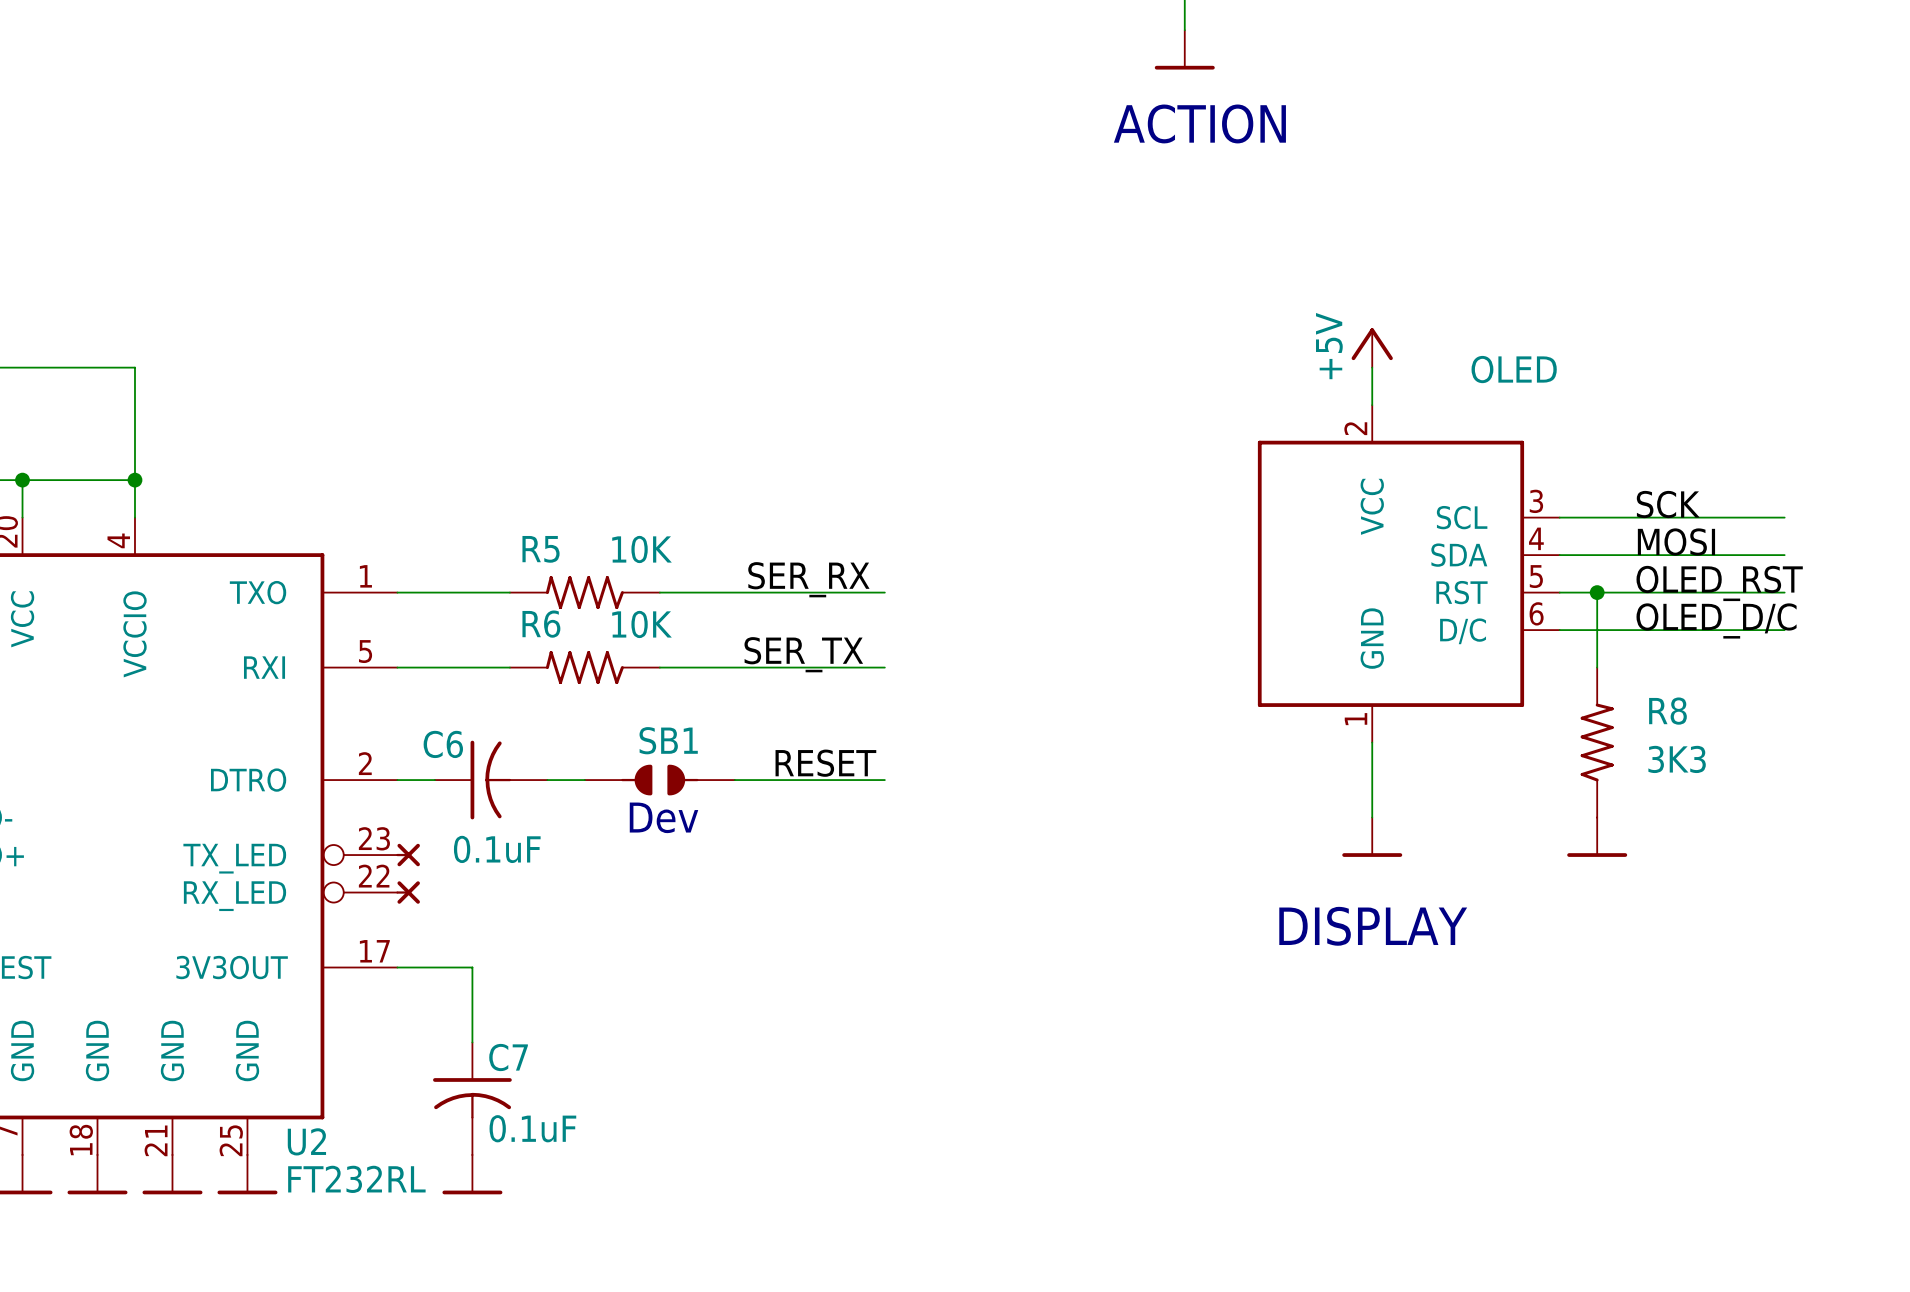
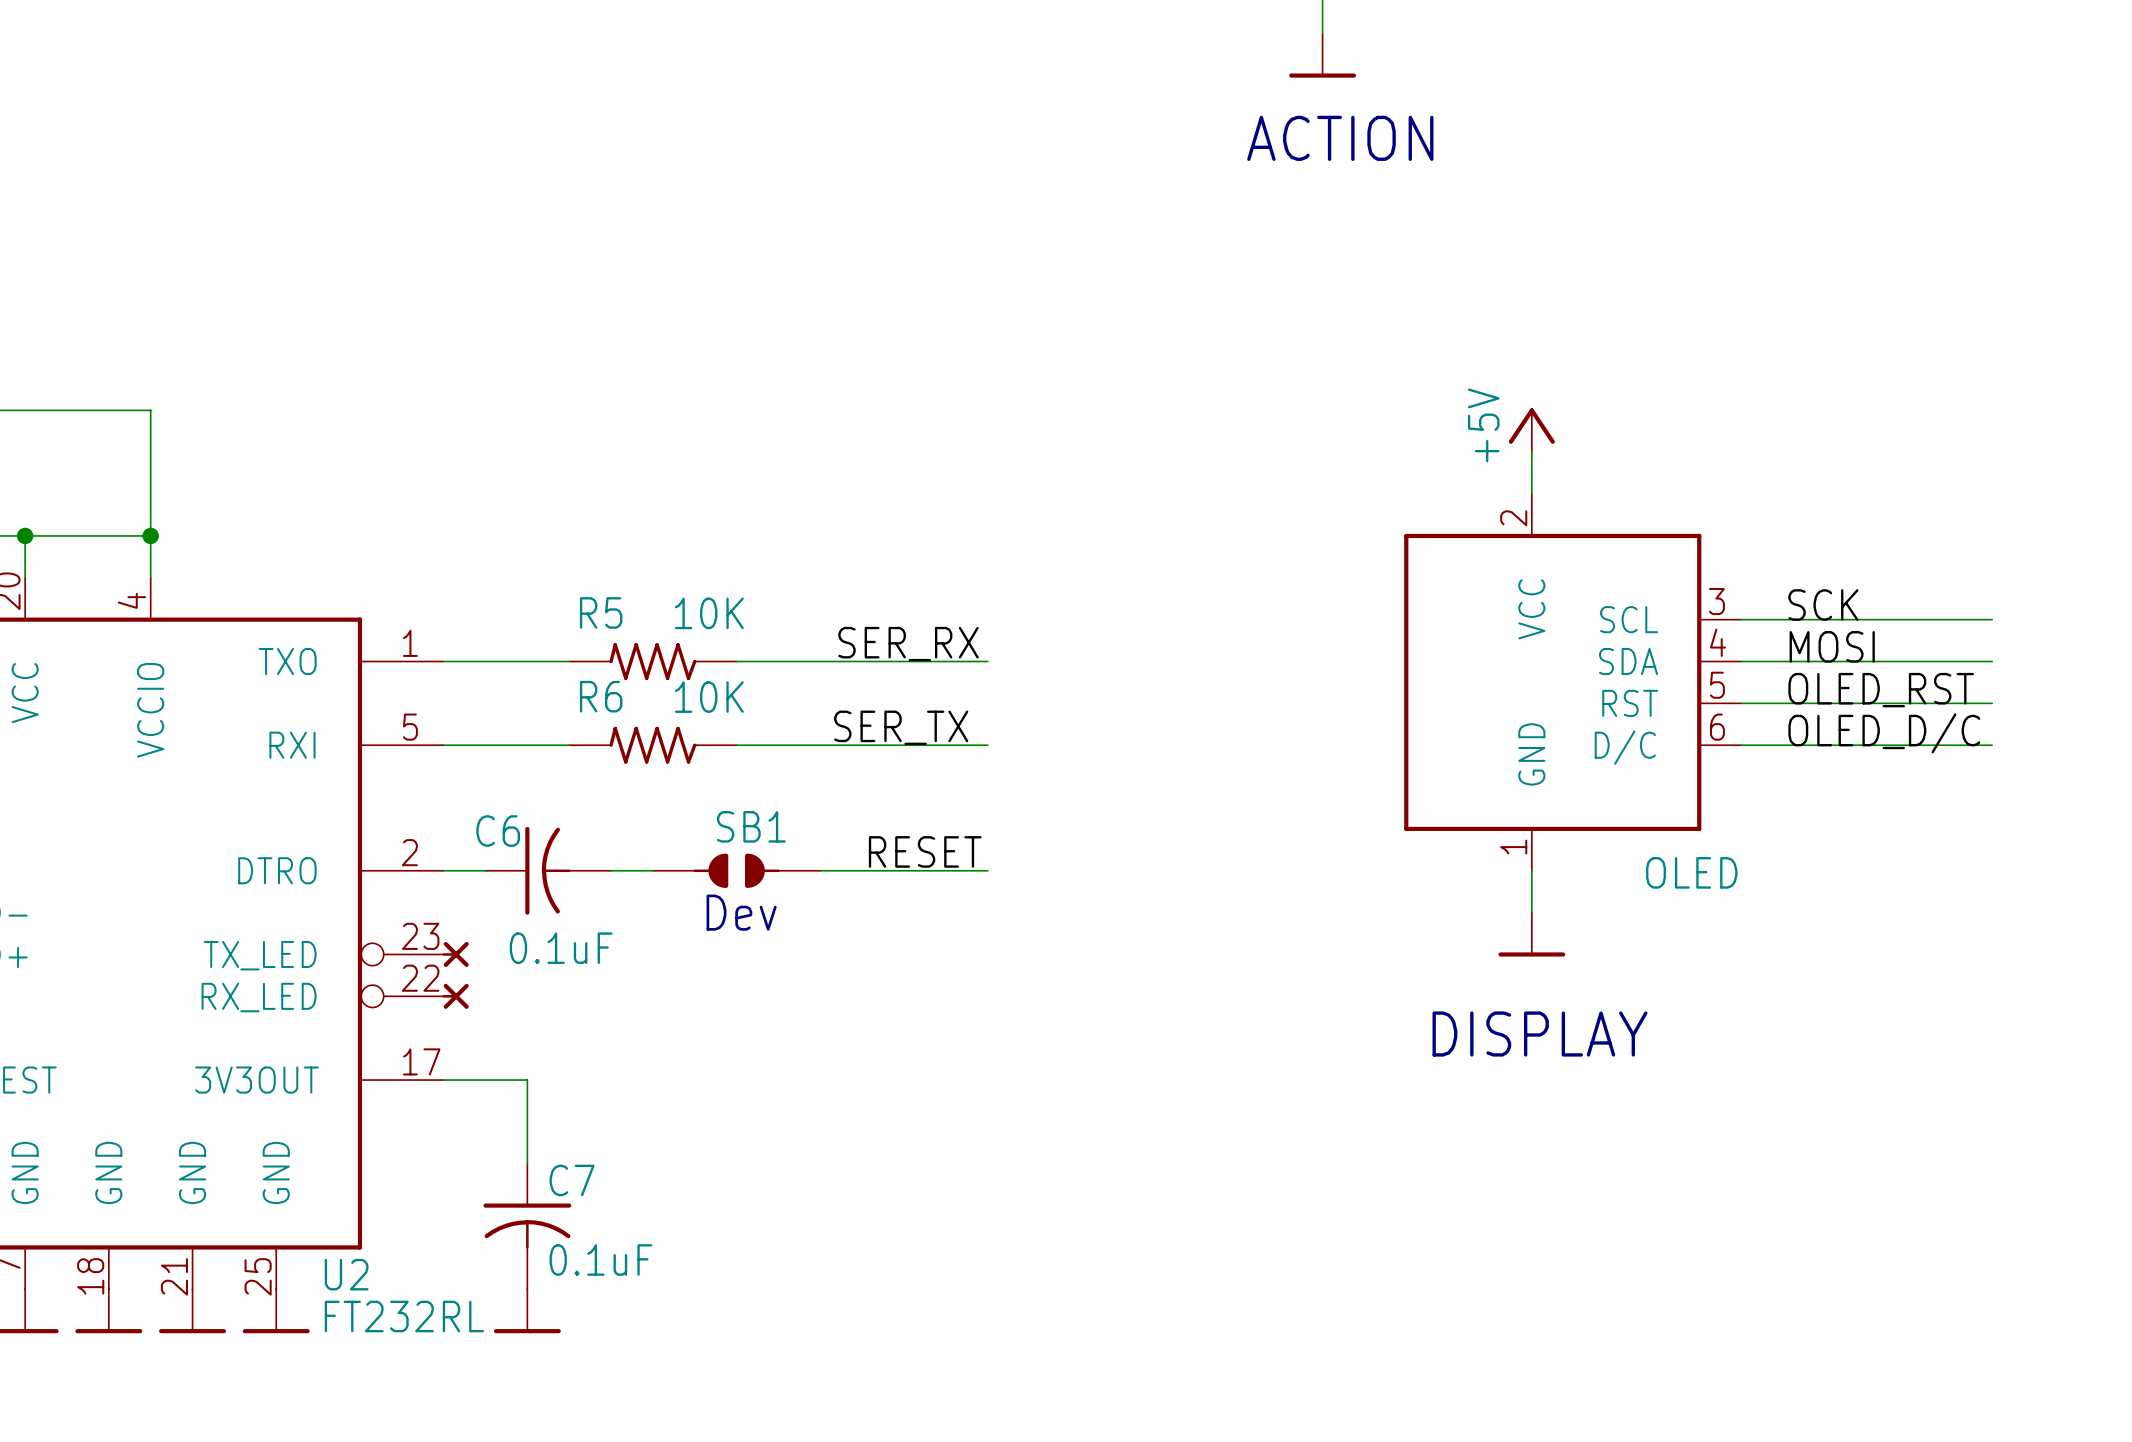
power symbol position: +5V (1372, 347) -> +5V (1531, 430)
OLED name position: OLED (1514, 369) -> OLED (1691, 872)
label position: SCK (1668, 504) -> SCK (1823, 605)
wire: (1559, 517) (1784, 517) -> (1741, 745) (1992, 745)
label position: MOSI (1676, 541) -> MOSI (1832, 646)
OLED position: (1408, 573) -> (1572, 682)
label position: OLED_RST (1719, 583) -> OLED_RST (1881, 690)
wire: (1597, 592) (1597, 667) -> none
junction: (1597, 592) -> none
label position: OLED_D/C (1716, 620) -> OLED_D/C (1884, 733)
R8: 3K3 (1597, 742) -> none
power symbol: (1597, 837) -> none

